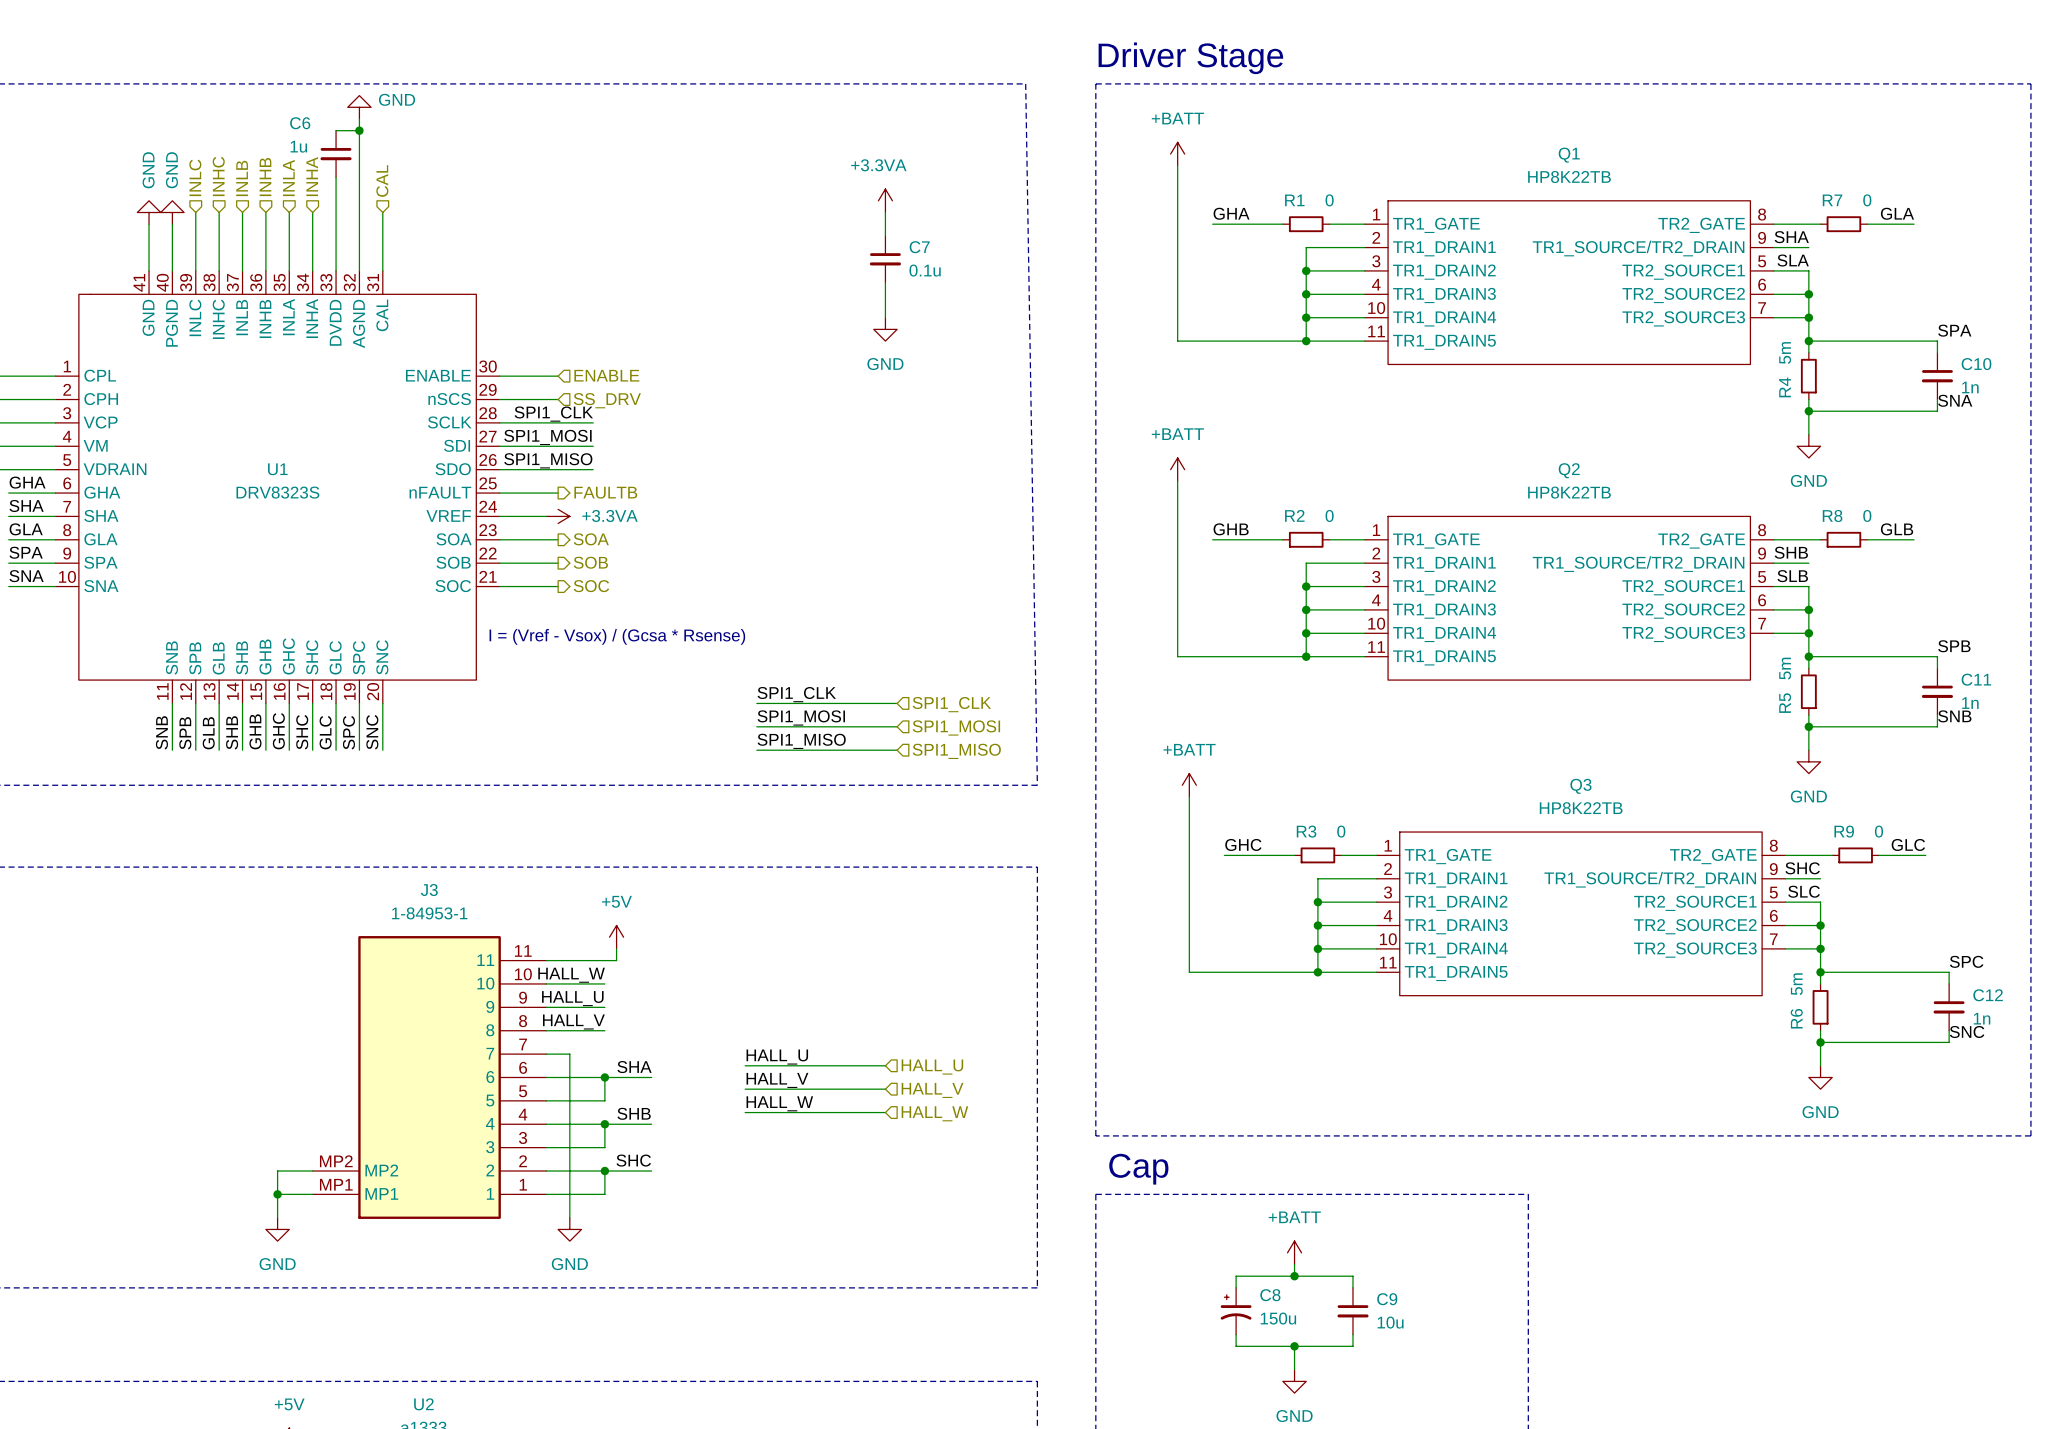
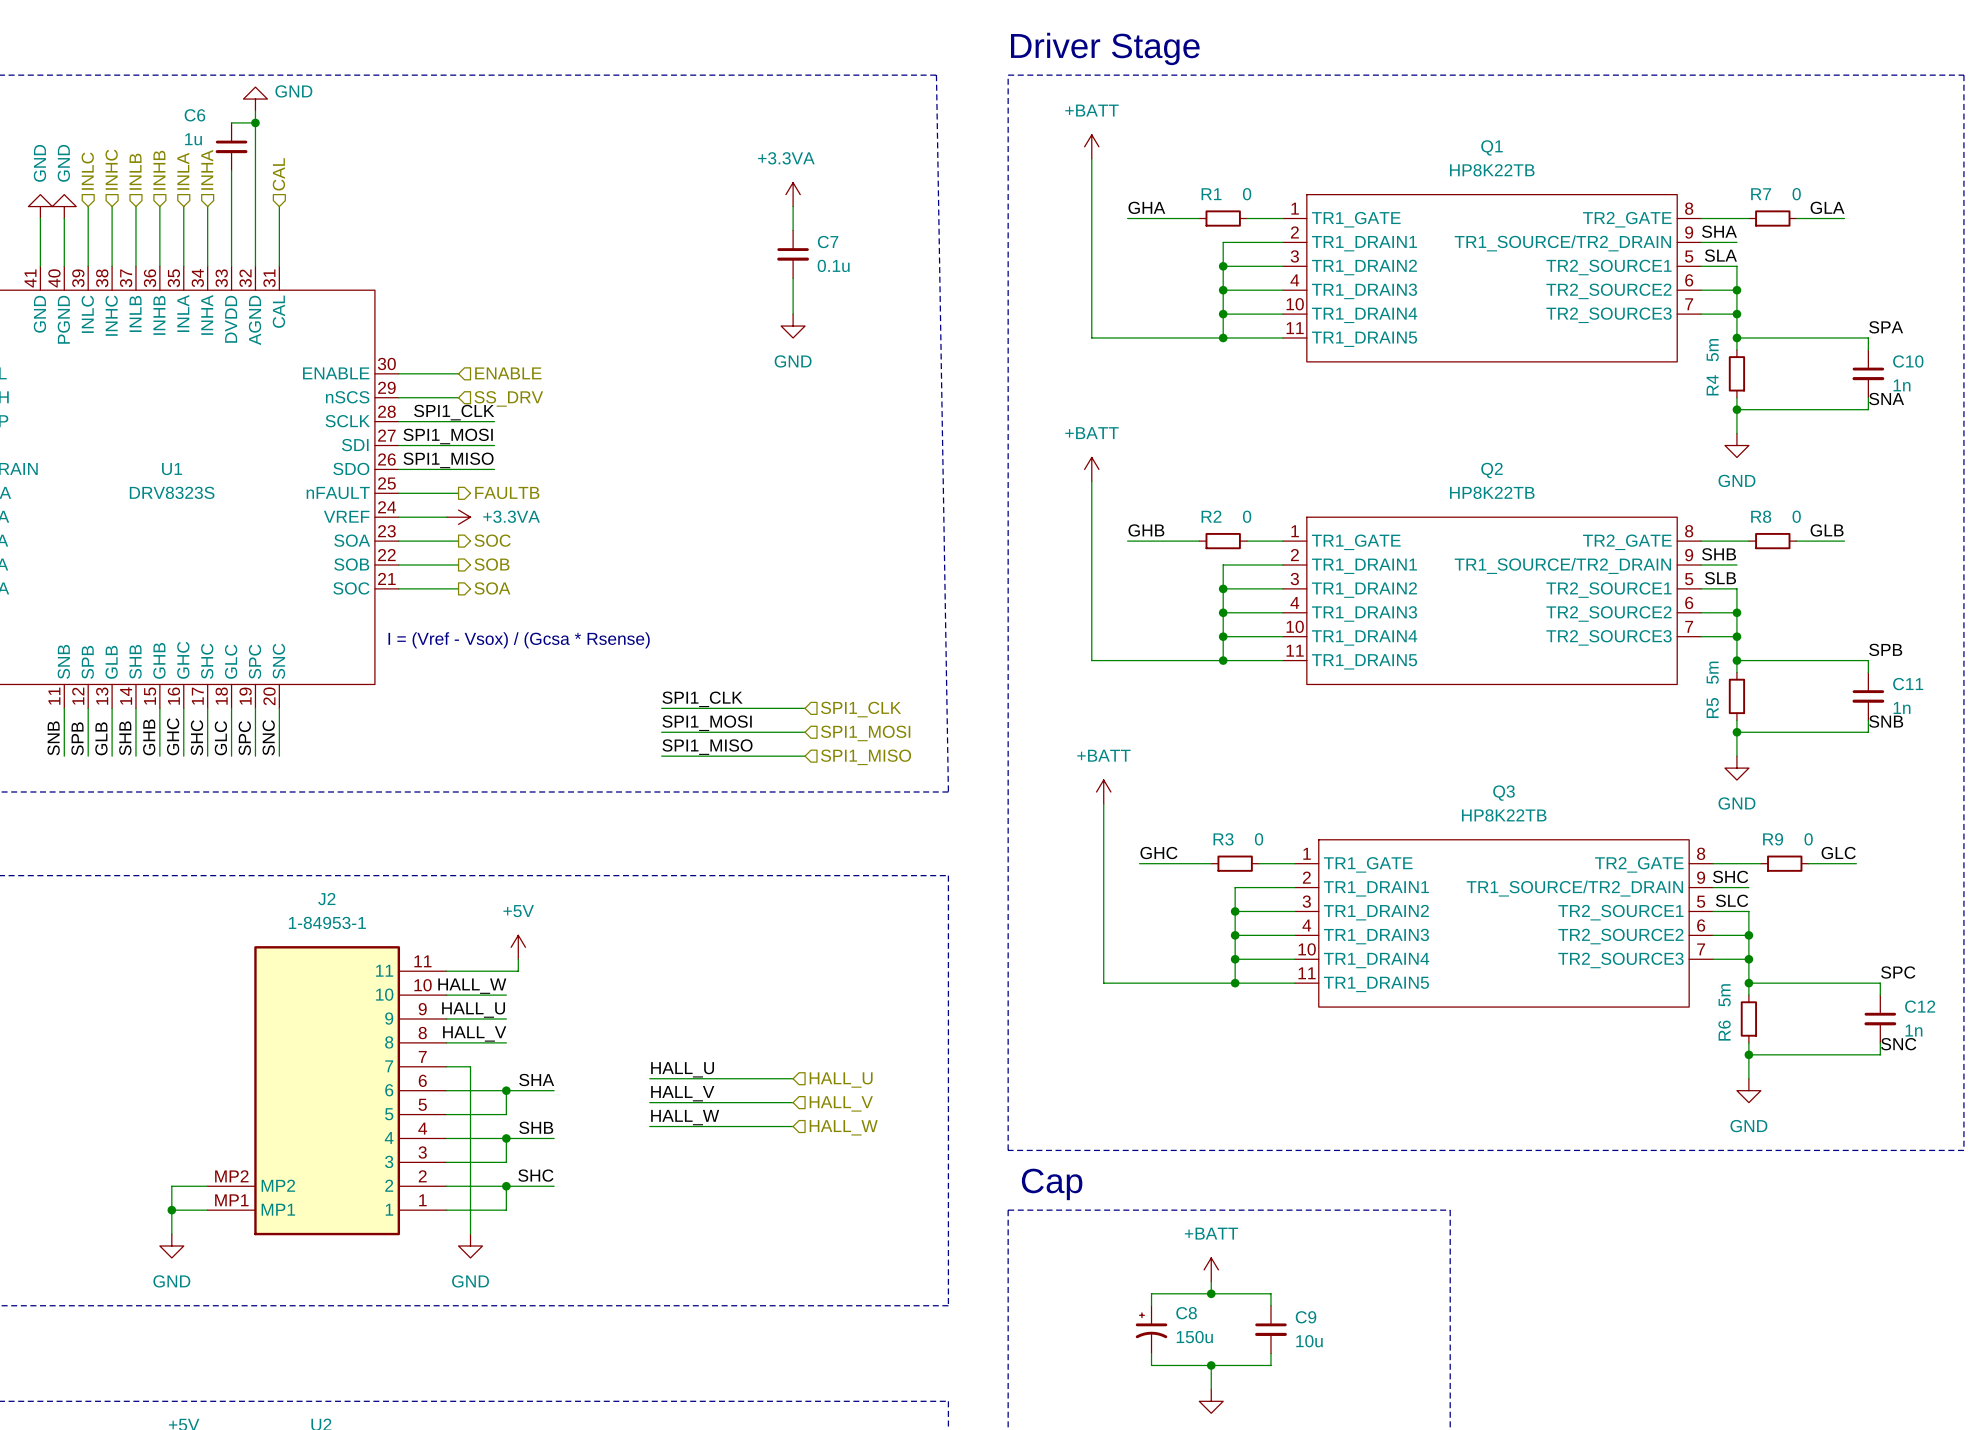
hierarchical label: SOA (591, 539) -> SOC (492, 540)
hierarchical label: SOC (591, 586) -> SOA (492, 588)
J3 name: J3 (429, 890) -> J2 (326, 899)

